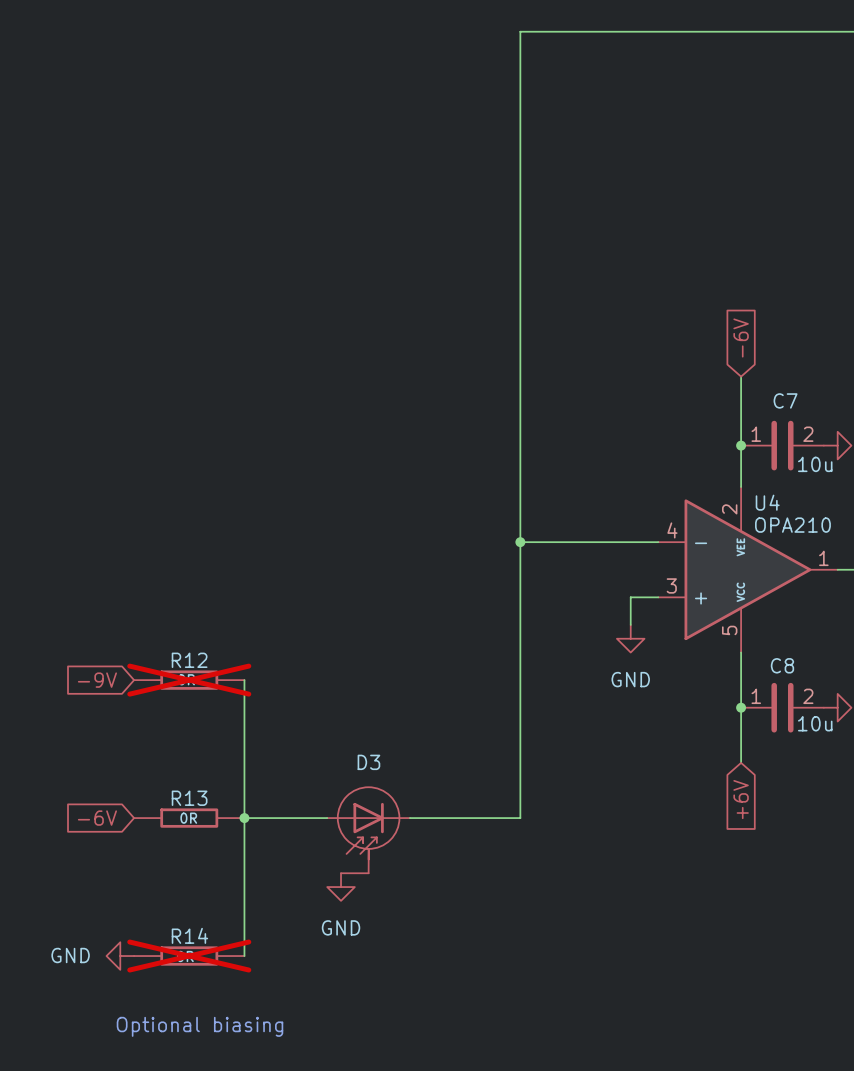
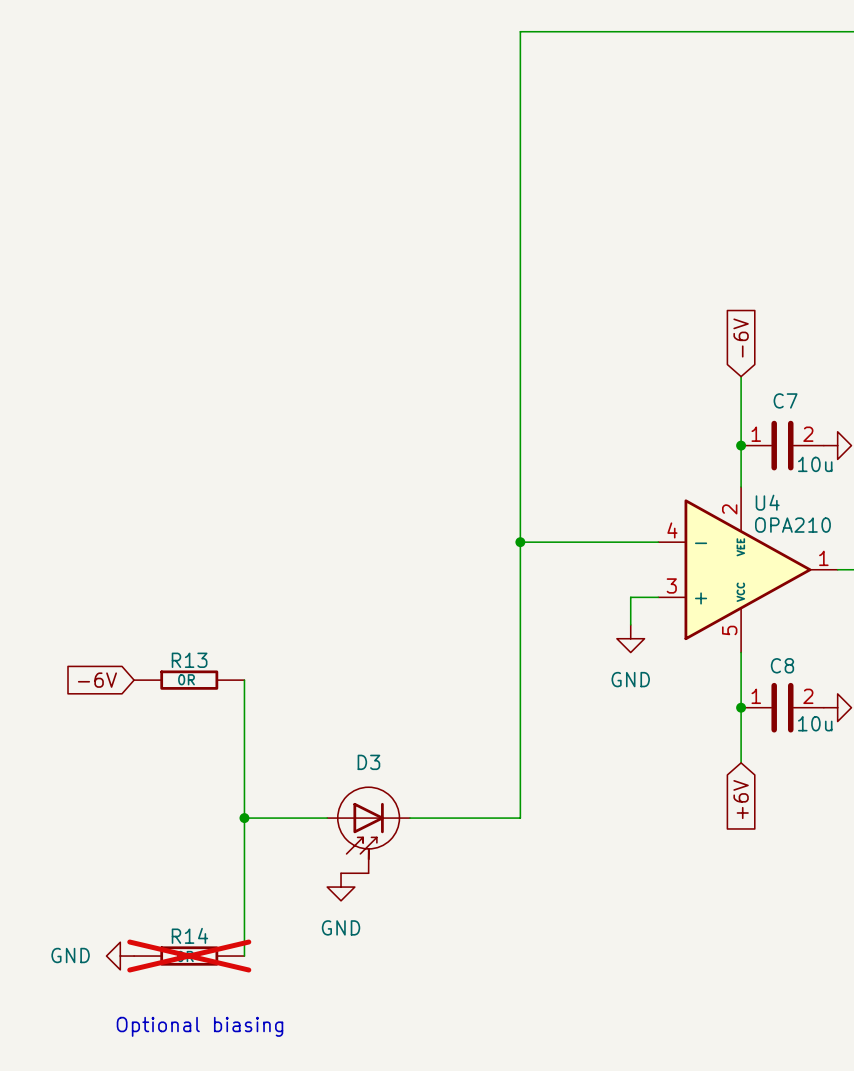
R12 name: R12 (189, 660) -> R13 (189, 660)
global label: -9V (97, 680) -> -6V (97, 680)
R12 do-not-place cross: (189, 680) -> none
global label: -6V (97, 818) -> none
R13: 0R (189, 818) -> none

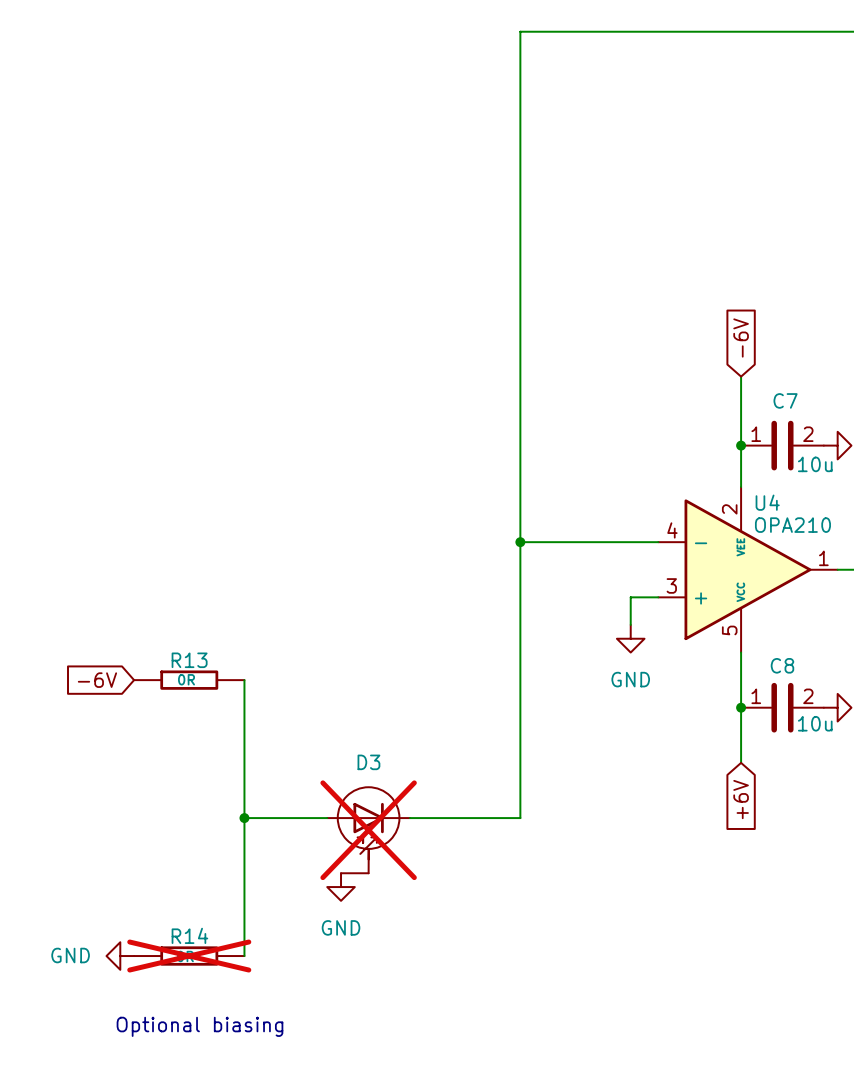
D3 do-not-place cross: none -> (368, 830)

